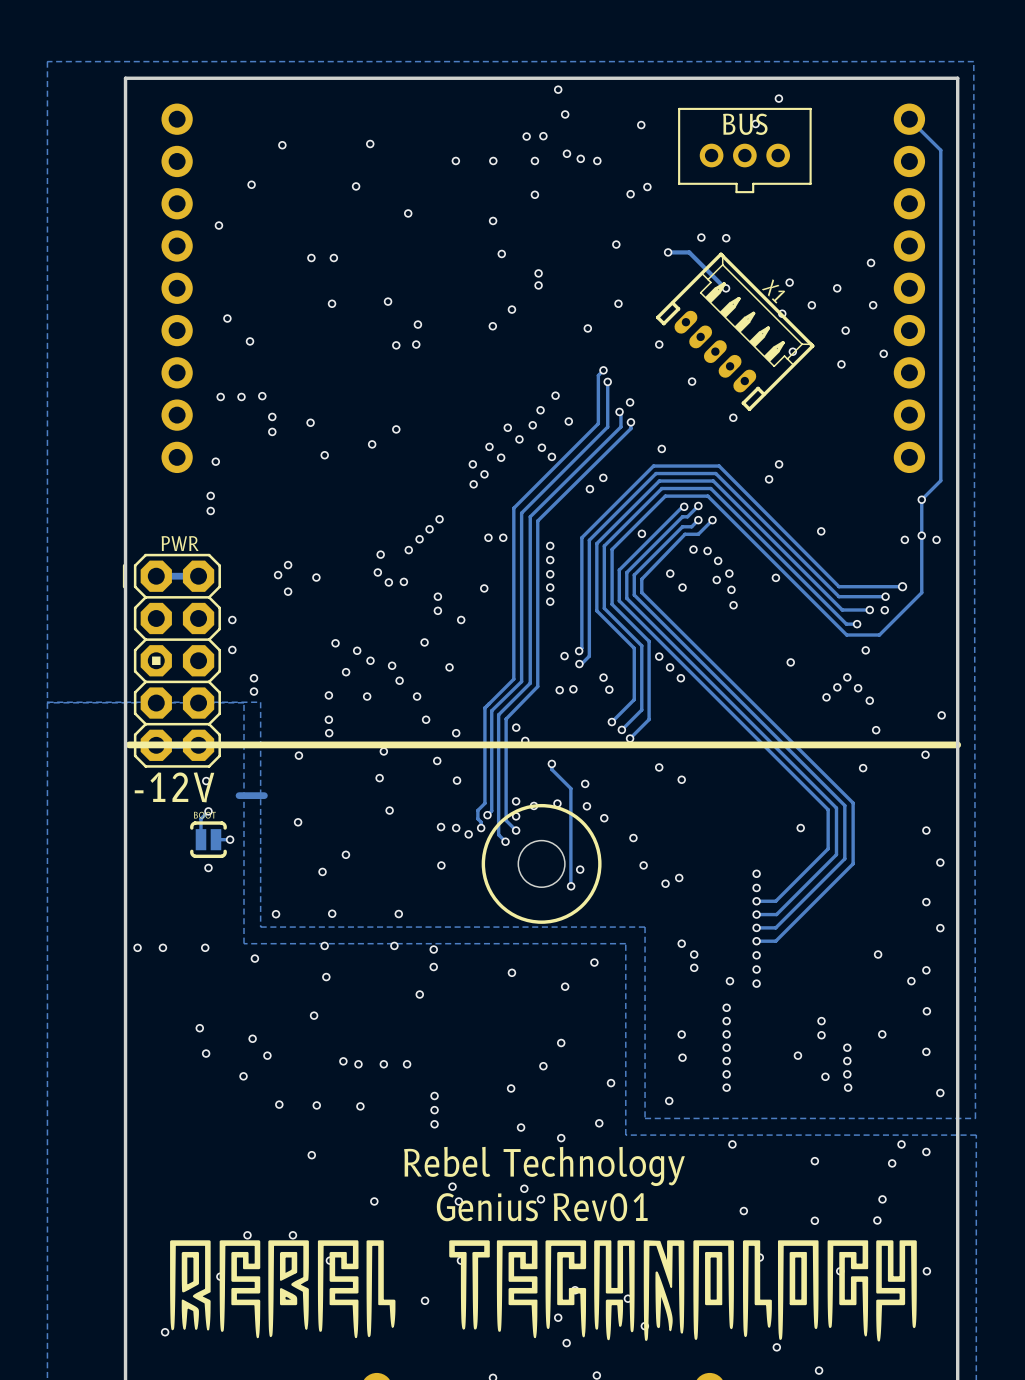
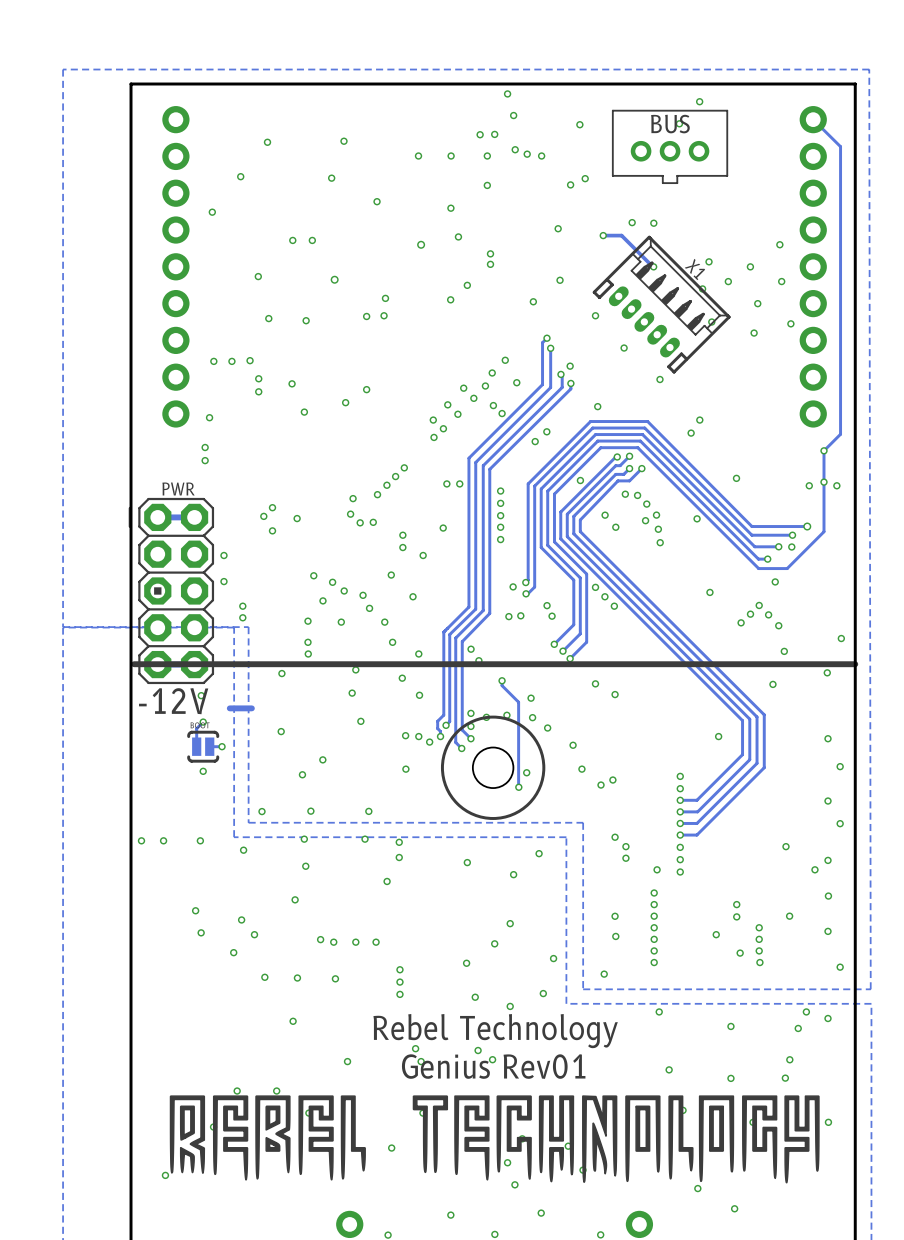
via: none -> (421, 244)
via: none -> (258, 276)
via: (388, 301) -> none
via: (332, 303) -> none
via: none -> (334, 279)
via: (227, 318) -> none
via: (250, 341) -> none
via: none -> (268, 318)
via: none -> (306, 320)

